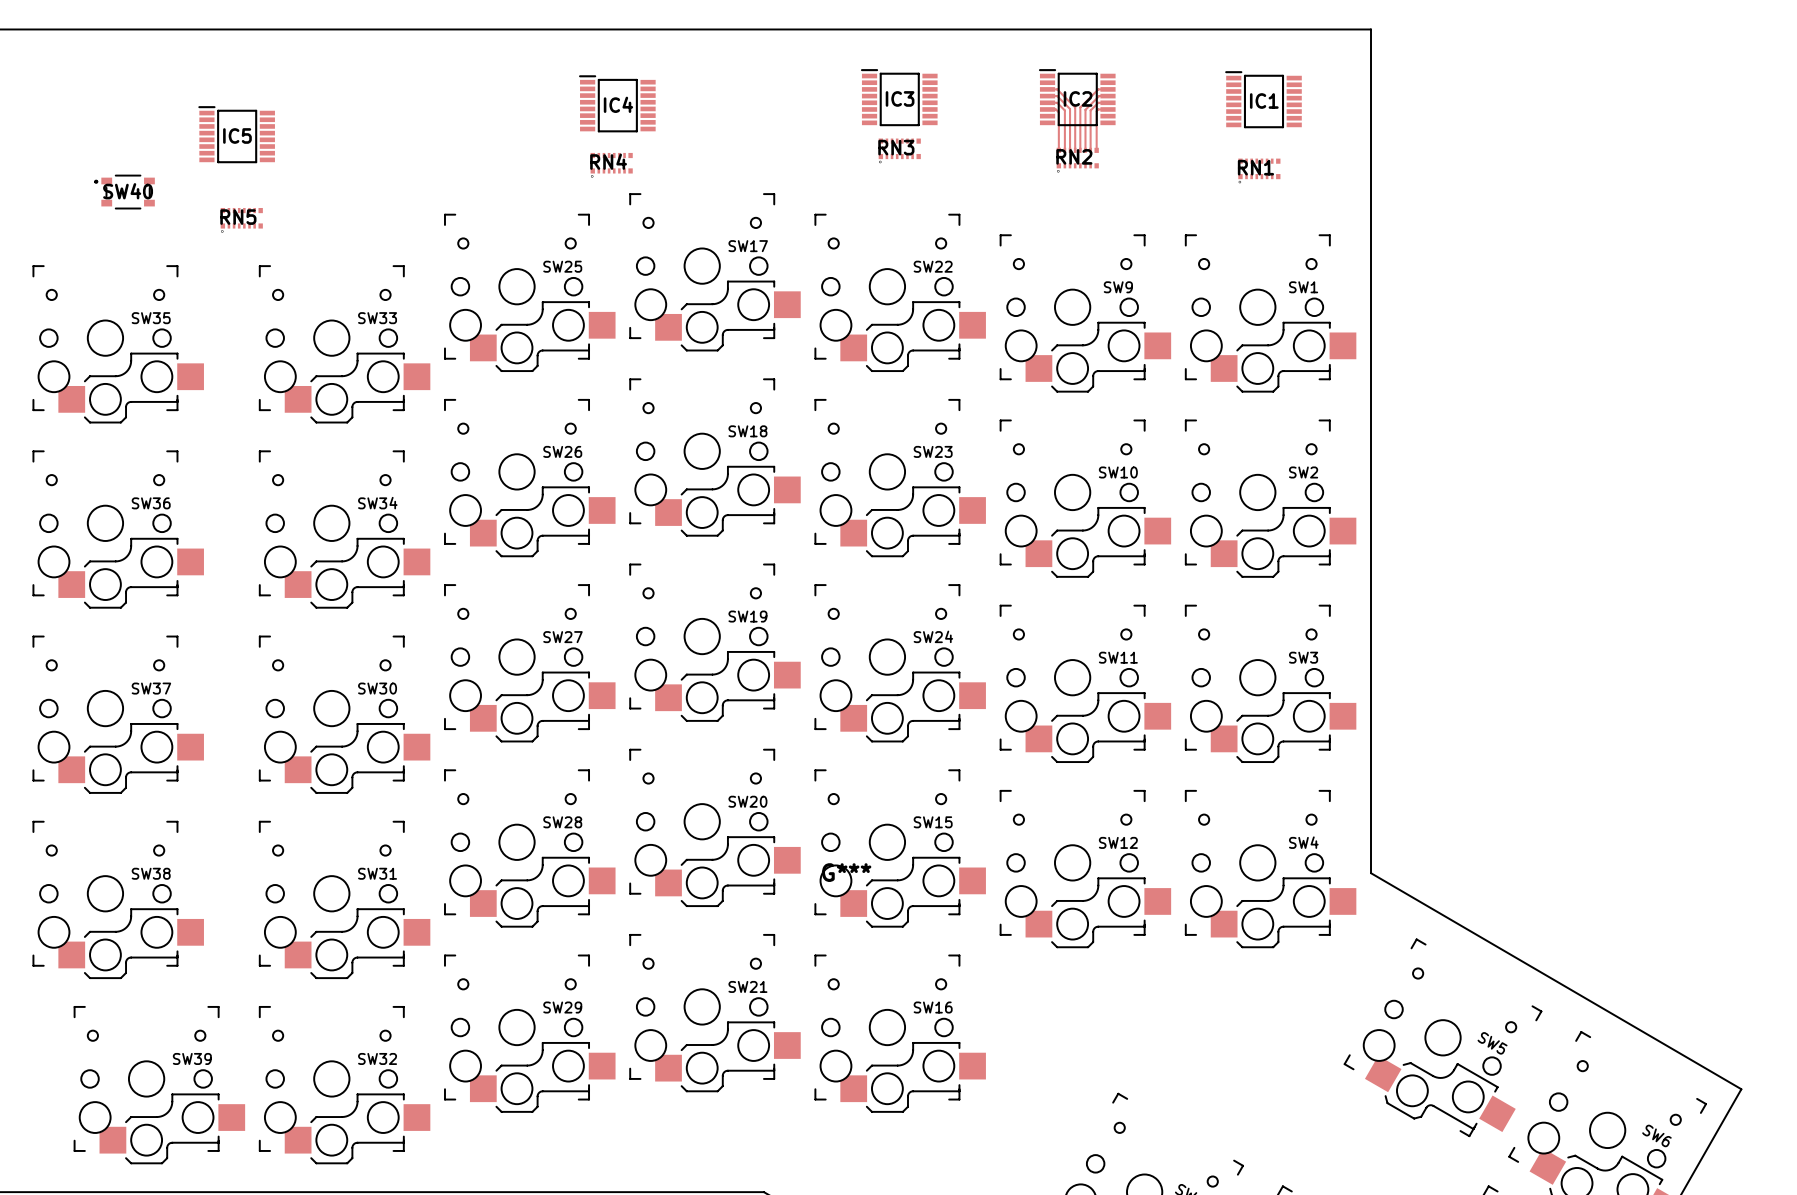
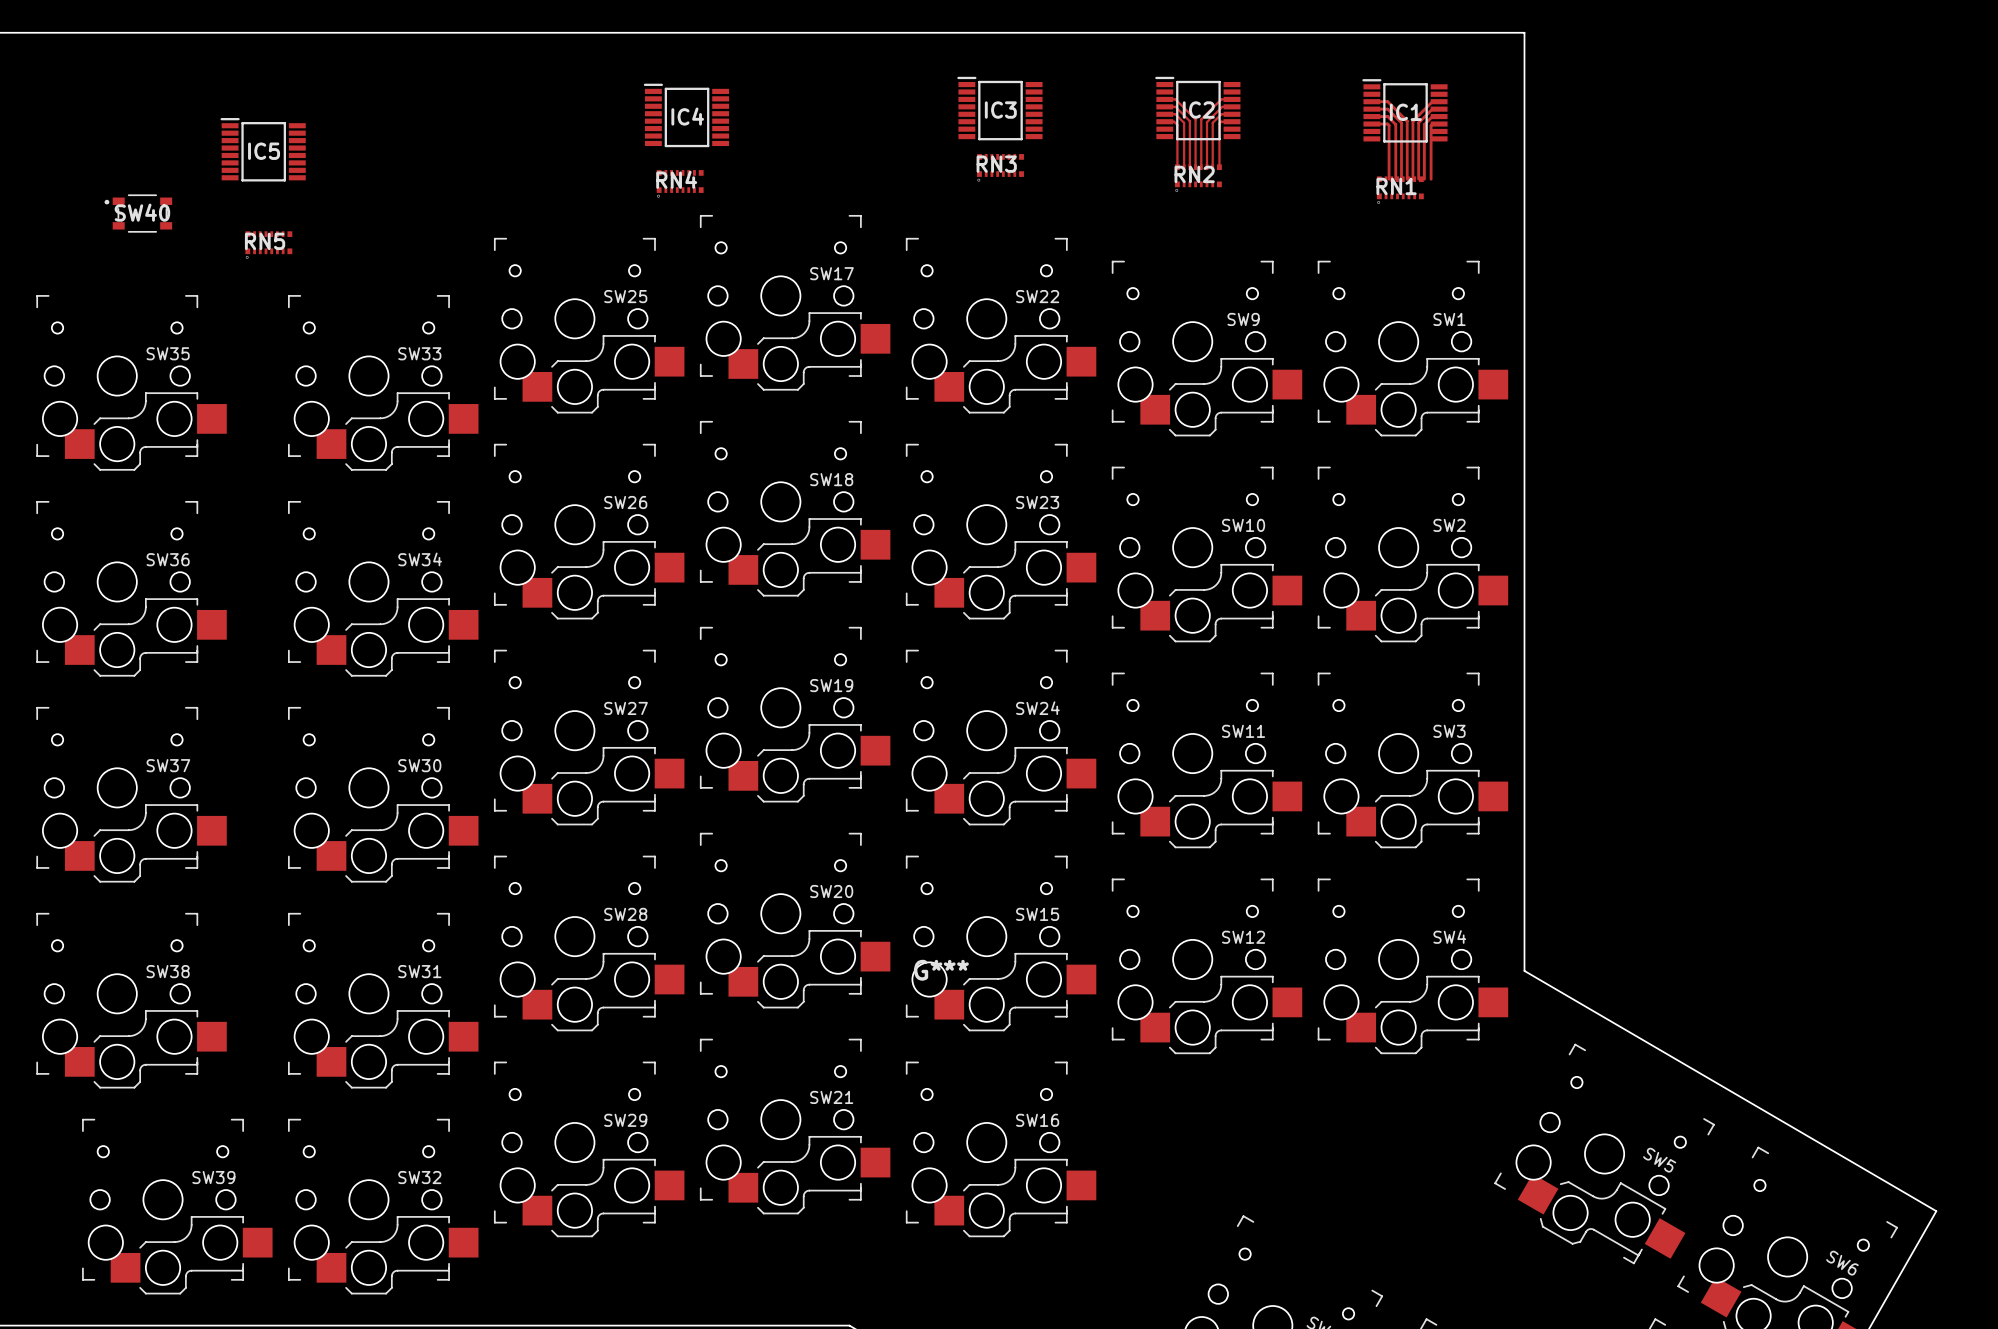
track: none -> (1376, 101) (1387, 101) (1407, 121) (1407, 179)
track: none -> (1443, 101) (1432, 101) (1412, 121) (1412, 179)
track: none -> (1376, 109) (1387, 109) (1401, 122) (1401, 179)
track: none -> (1443, 109) (1432, 109) (1418, 122) (1418, 179)
track: none -> (1376, 116) (1387, 116) (1395, 124) (1395, 179)
track: none -> (1443, 116) (1432, 116) (1424, 124) (1424, 179)
track: none -> (1376, 124) (1389, 125) (1389, 179)
track: none -> (1443, 124) (1431, 125) (1431, 179)

